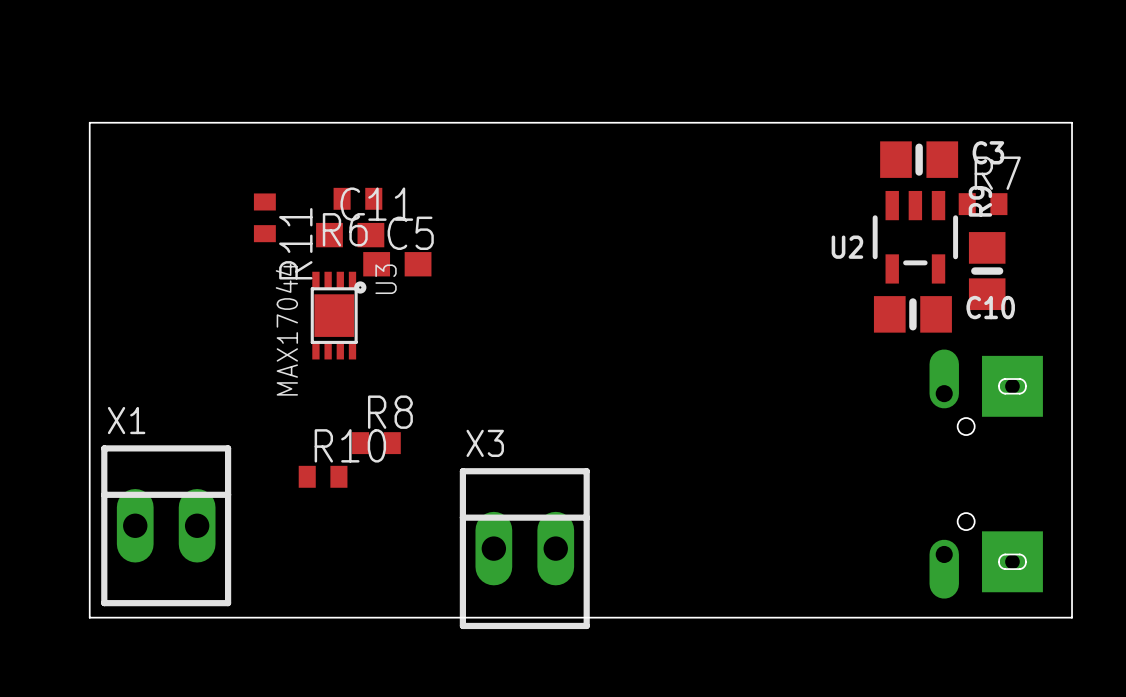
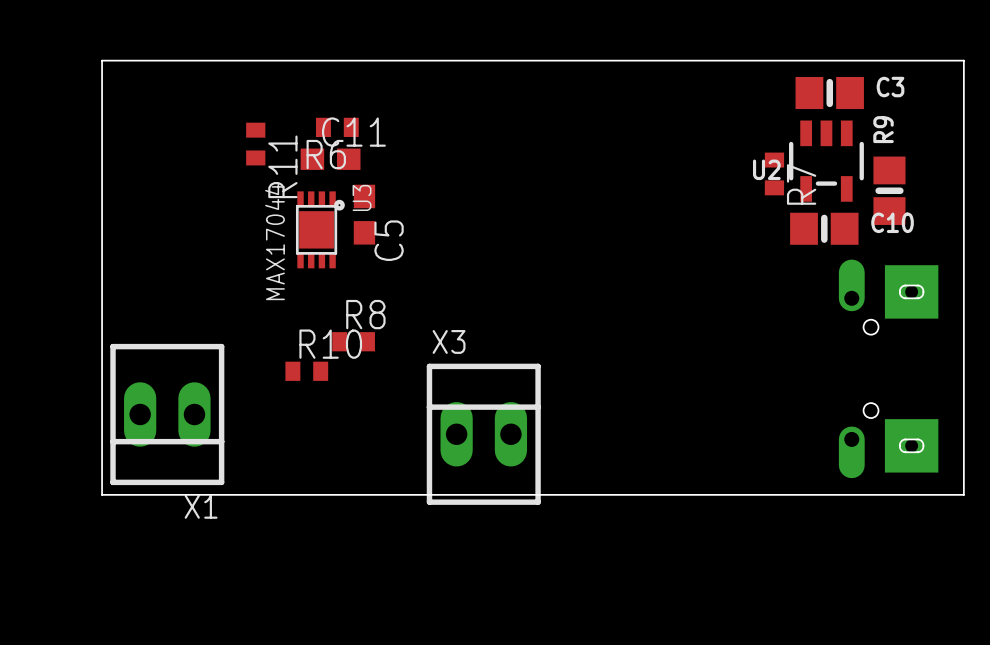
R7 rotation: 0° (983, 204) -> 90° clockwise (774, 173)
R7 position: (983, 204) -> (774, 173)
C5 rotation: 0° (397, 264) -> 90° clockwise (364, 214)
X1 rotation: 0° (166, 525) -> 180° (167, 414)

